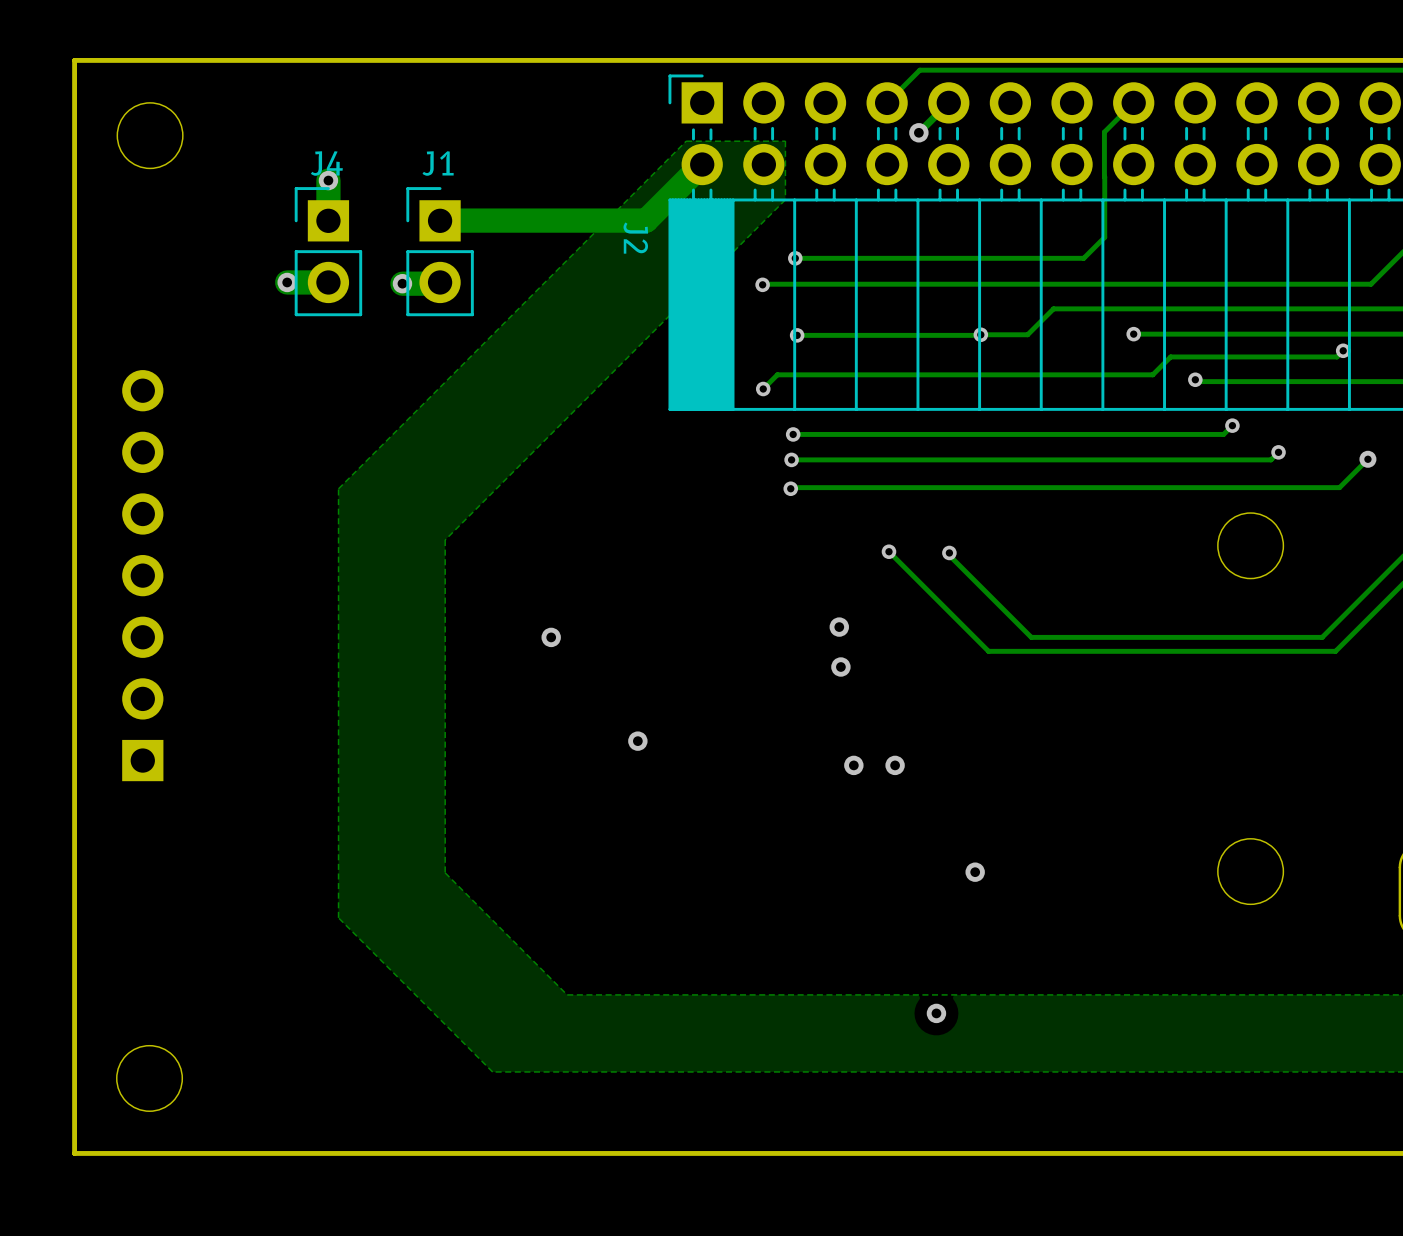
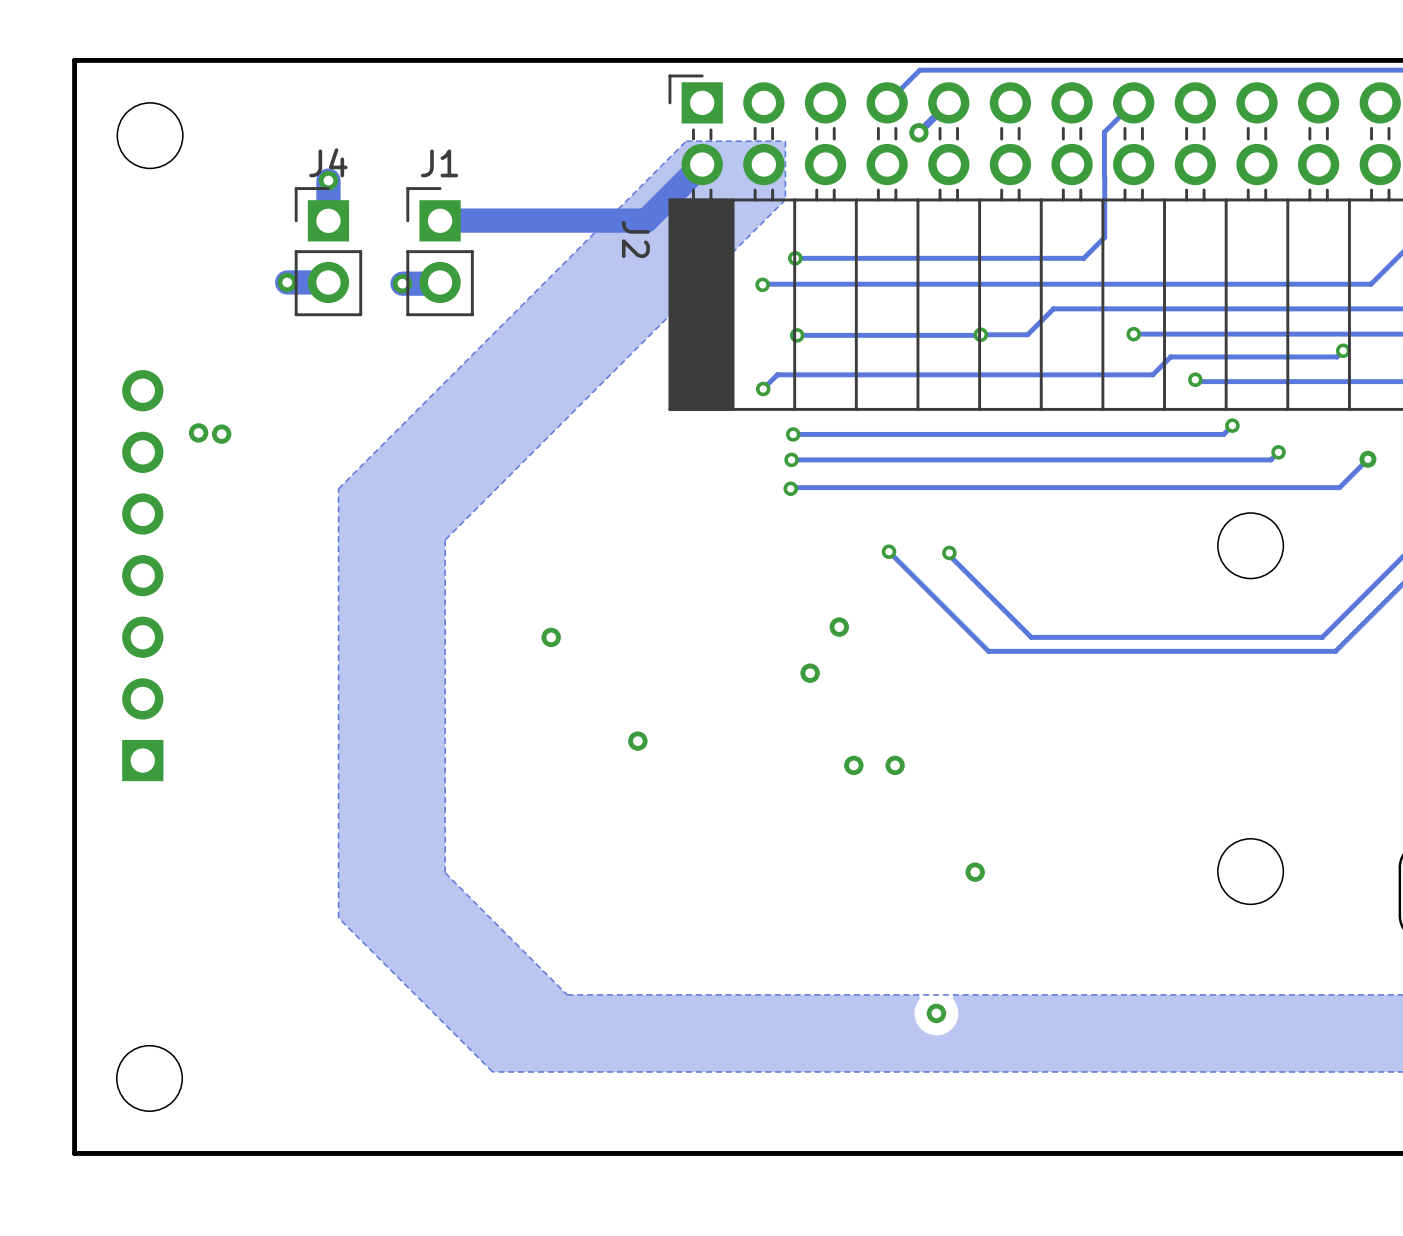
via: none -> (198, 432)
via: none -> (221, 434)
via position: (840, 667) -> (810, 673)

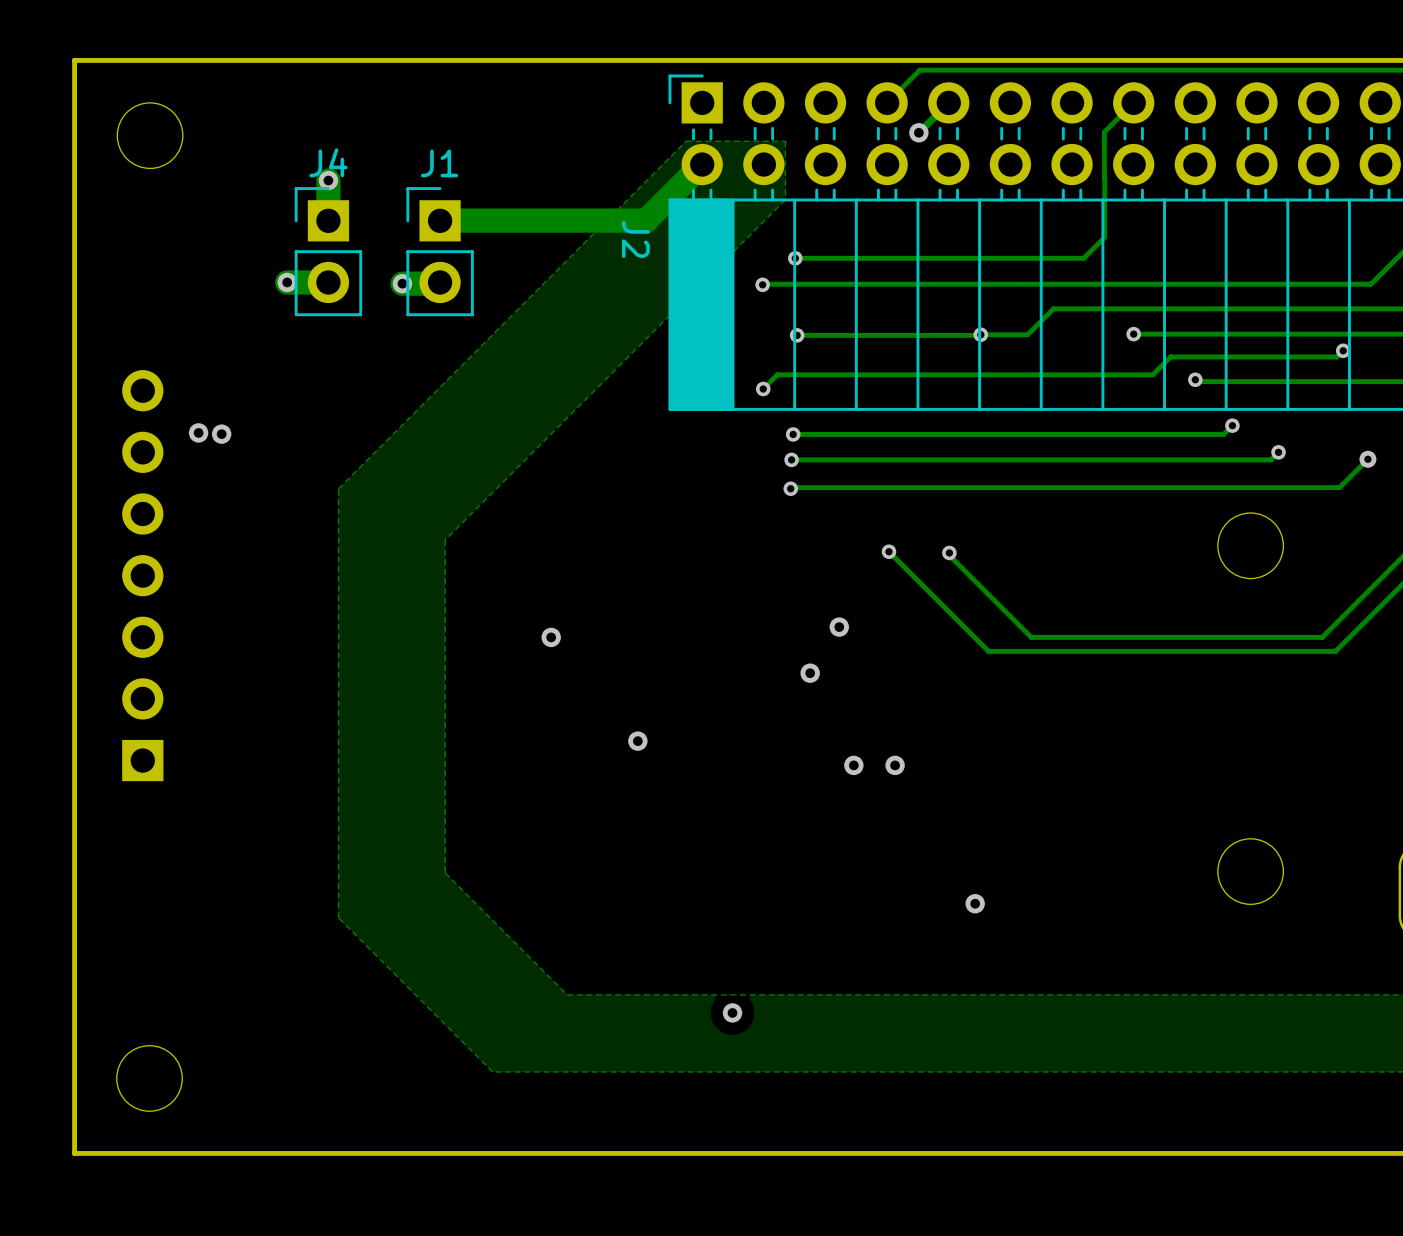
via position: (975, 872) -> (975, 903)
via: none -> (732, 1012)
via: (936, 1013) -> none

